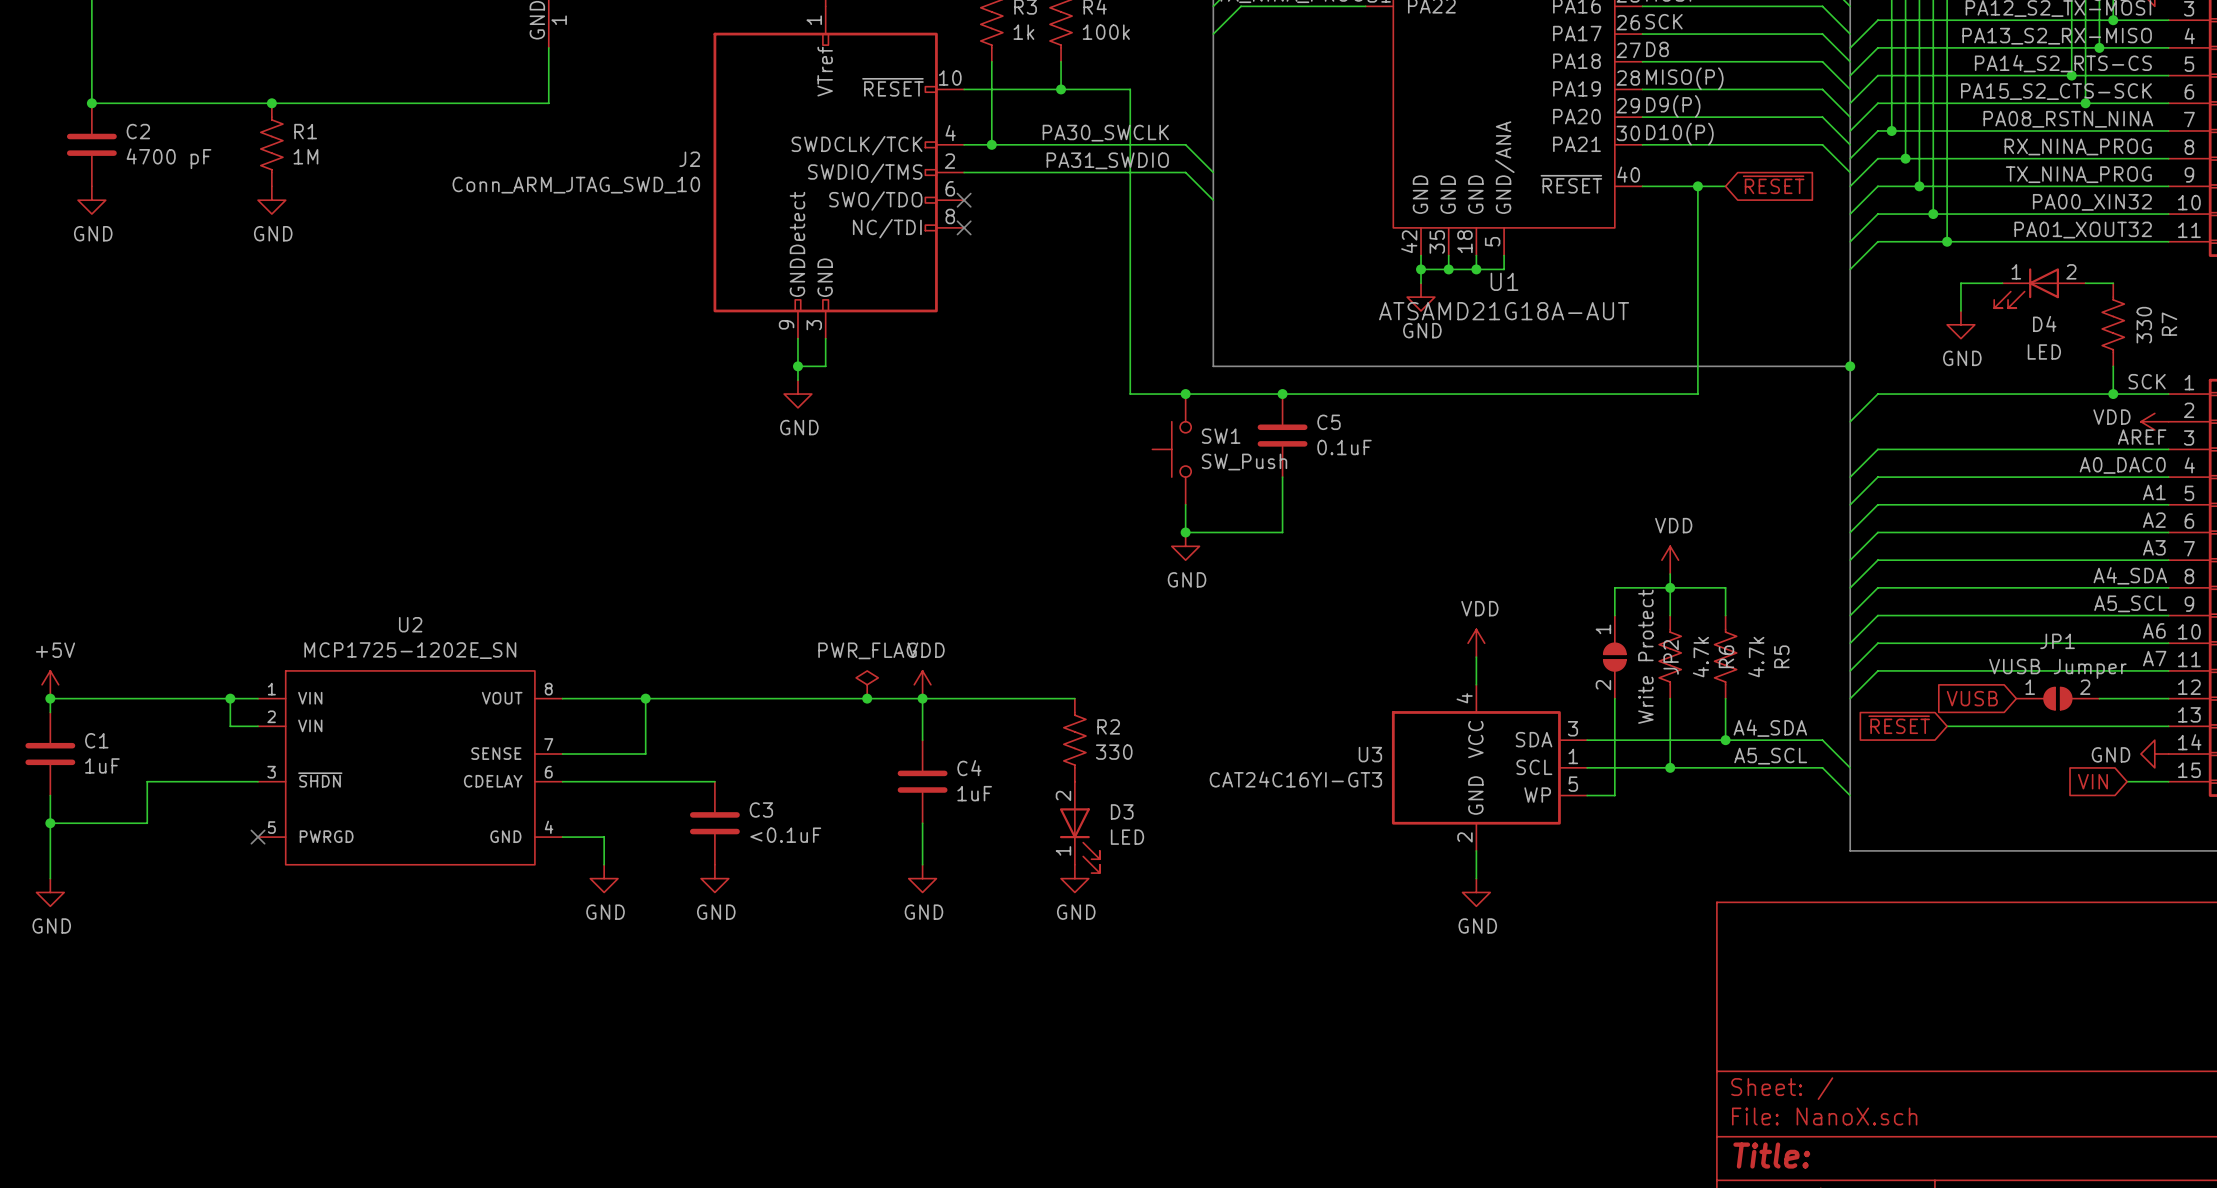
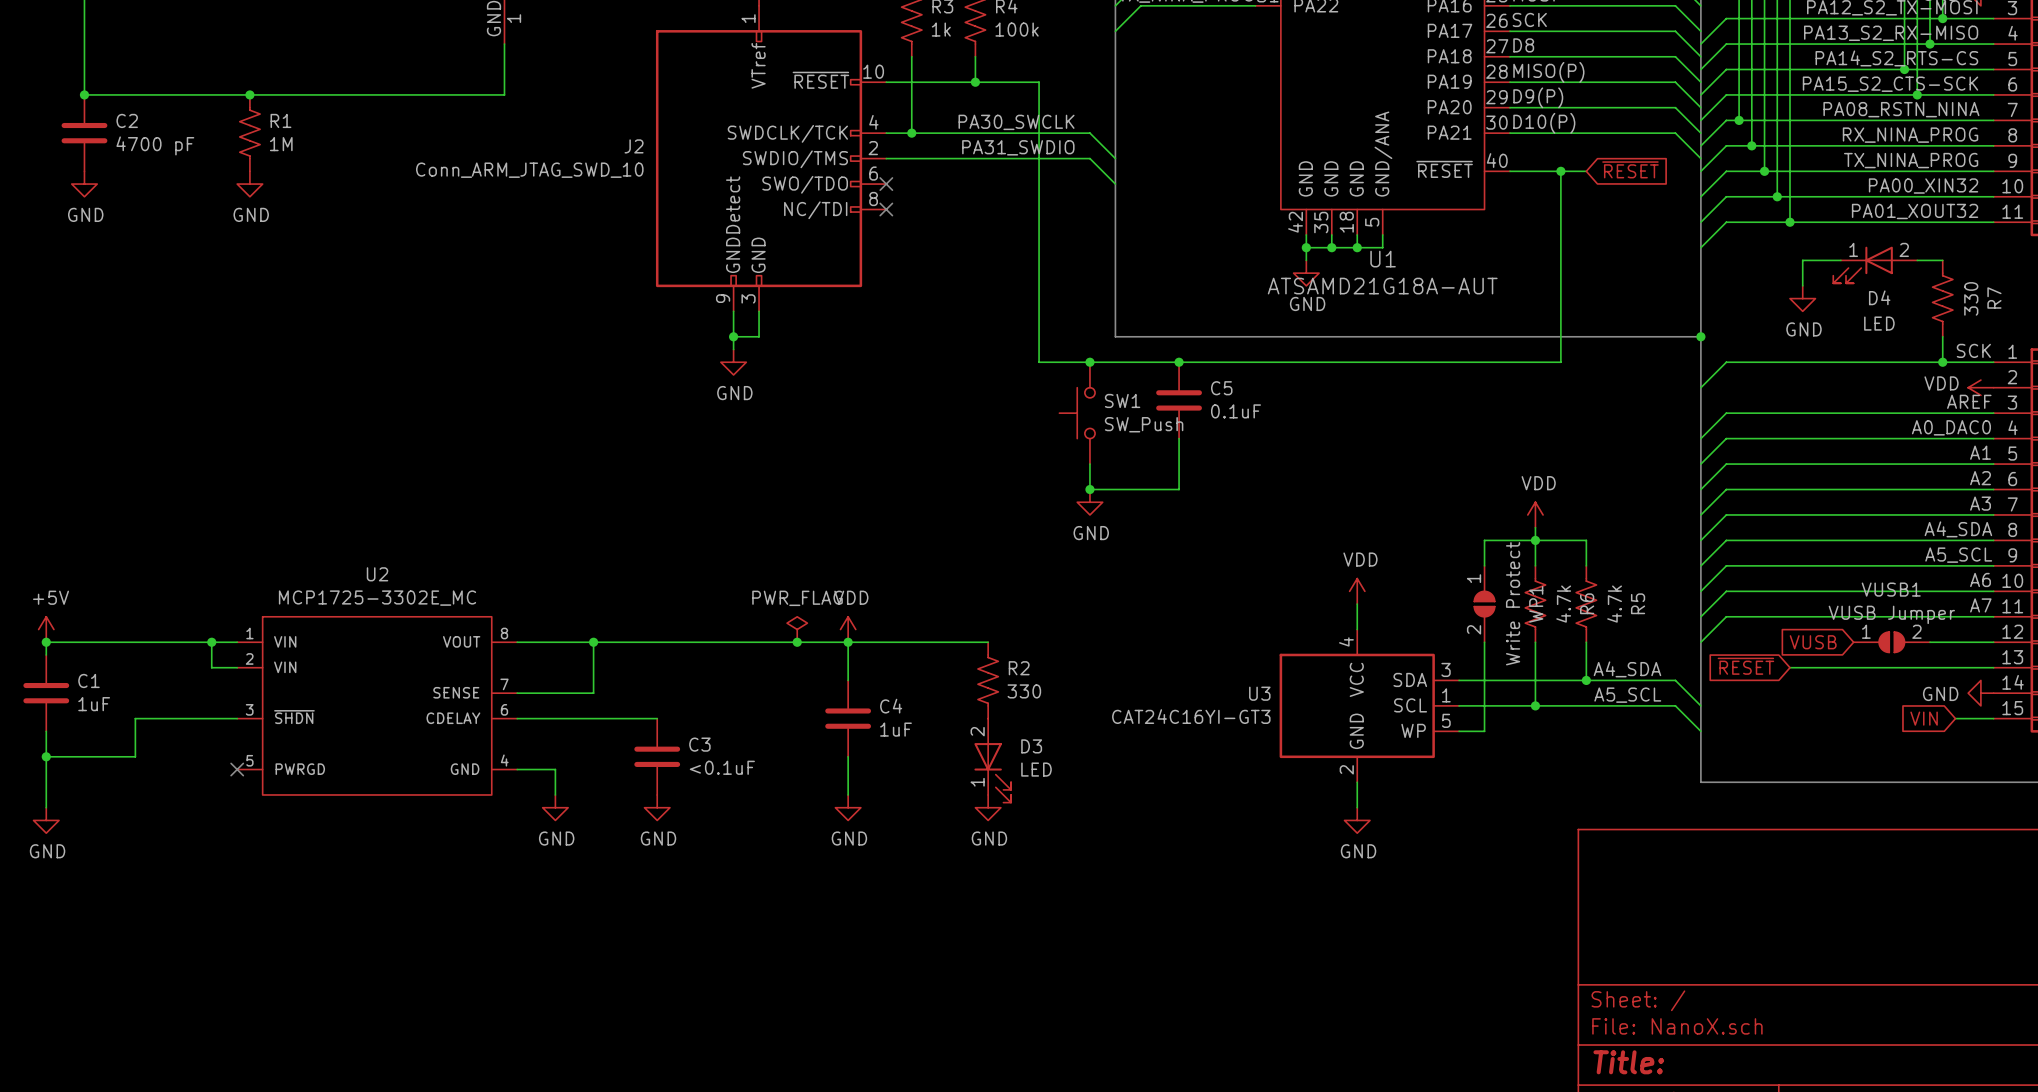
JP1 name: JP1 (2057, 641) -> VUSB1 (1891, 589)
U2 value: MCP1725-1202E_SN (410, 650) -> MCP1725-3302E_MC (377, 598)
JP2 name: JP2 (1671, 657) -> WP1 (1536, 604)

